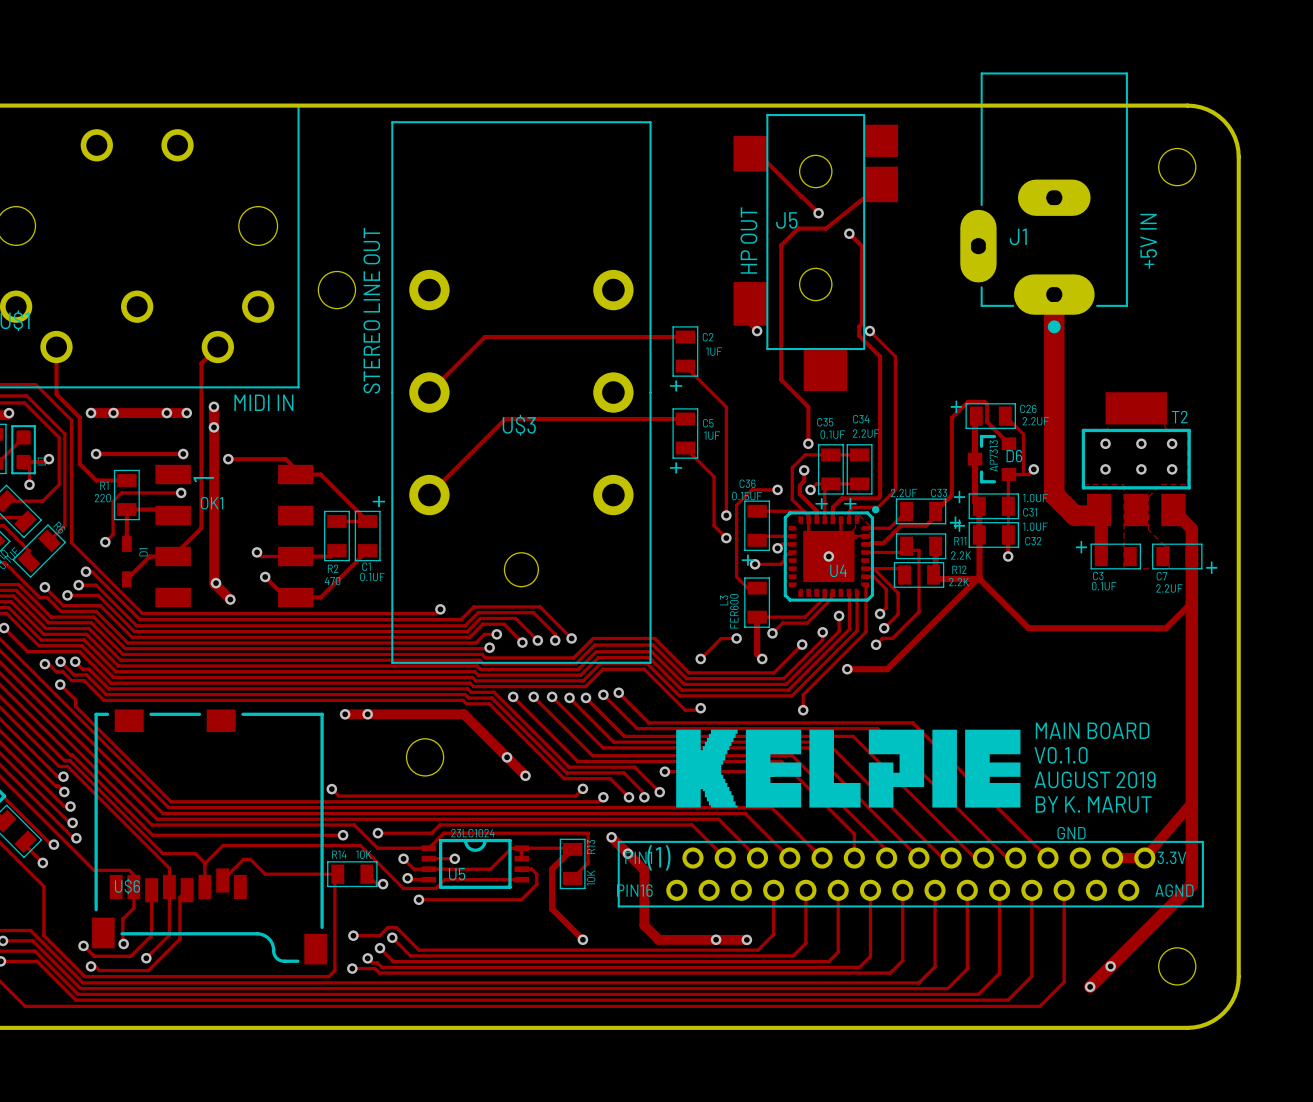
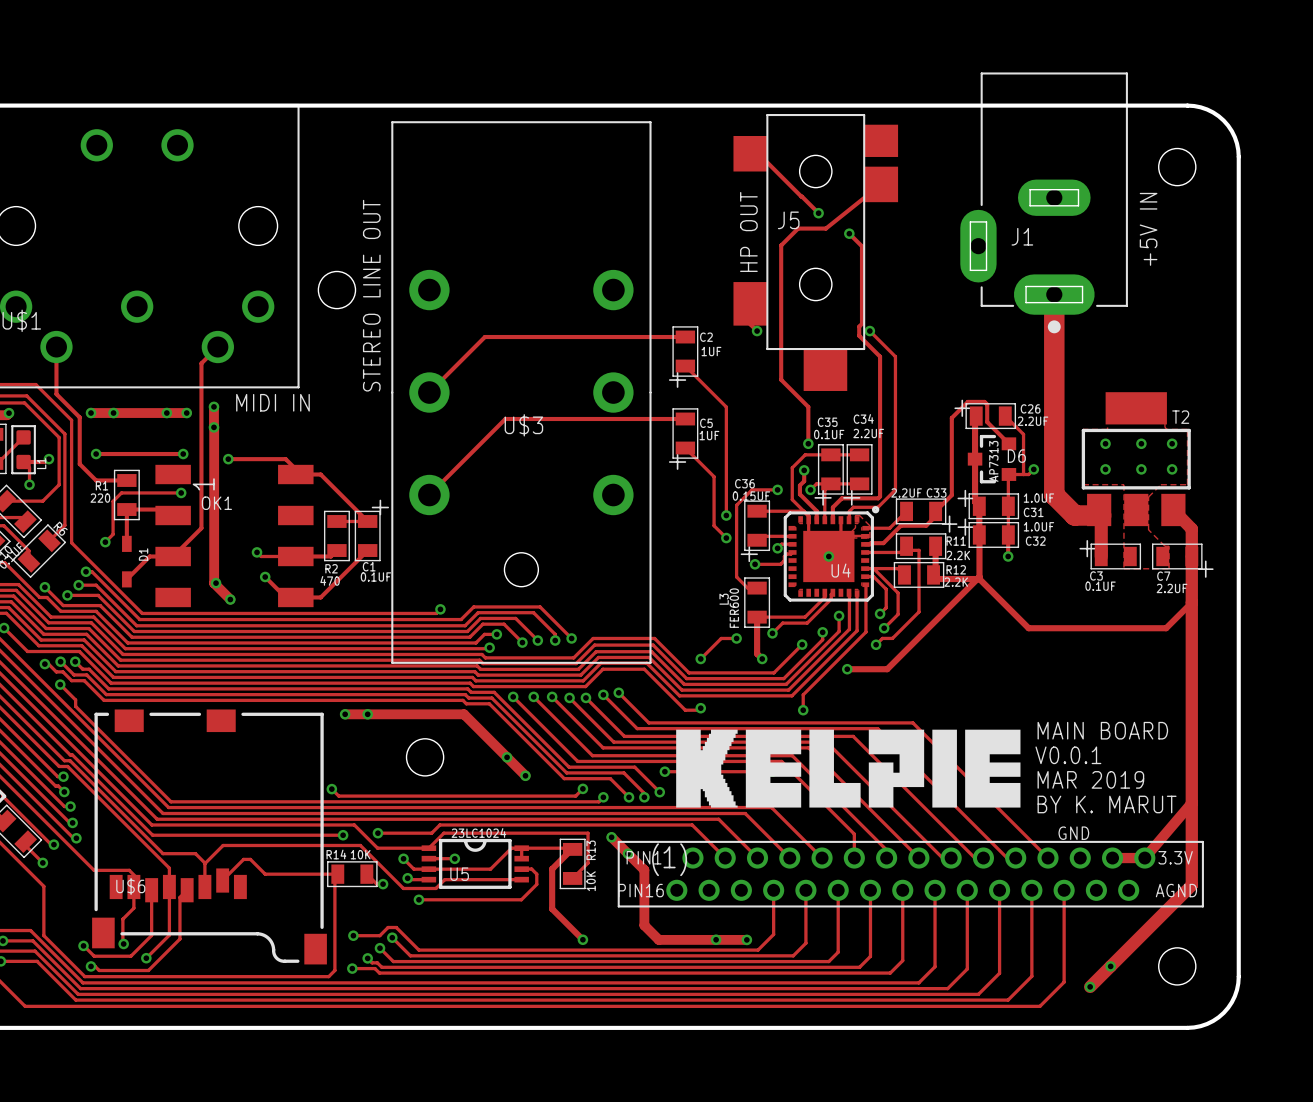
text: V0.1.0 (1061, 755) -> V0.0.1 (1068, 755)
text: AUGUST 2019 (1095, 779) -> MAR 2019 (1090, 779)

